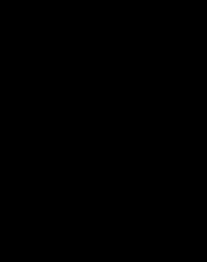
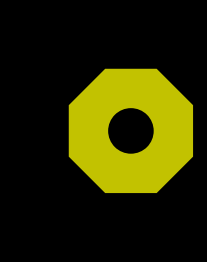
part: none -> (130, 130)

